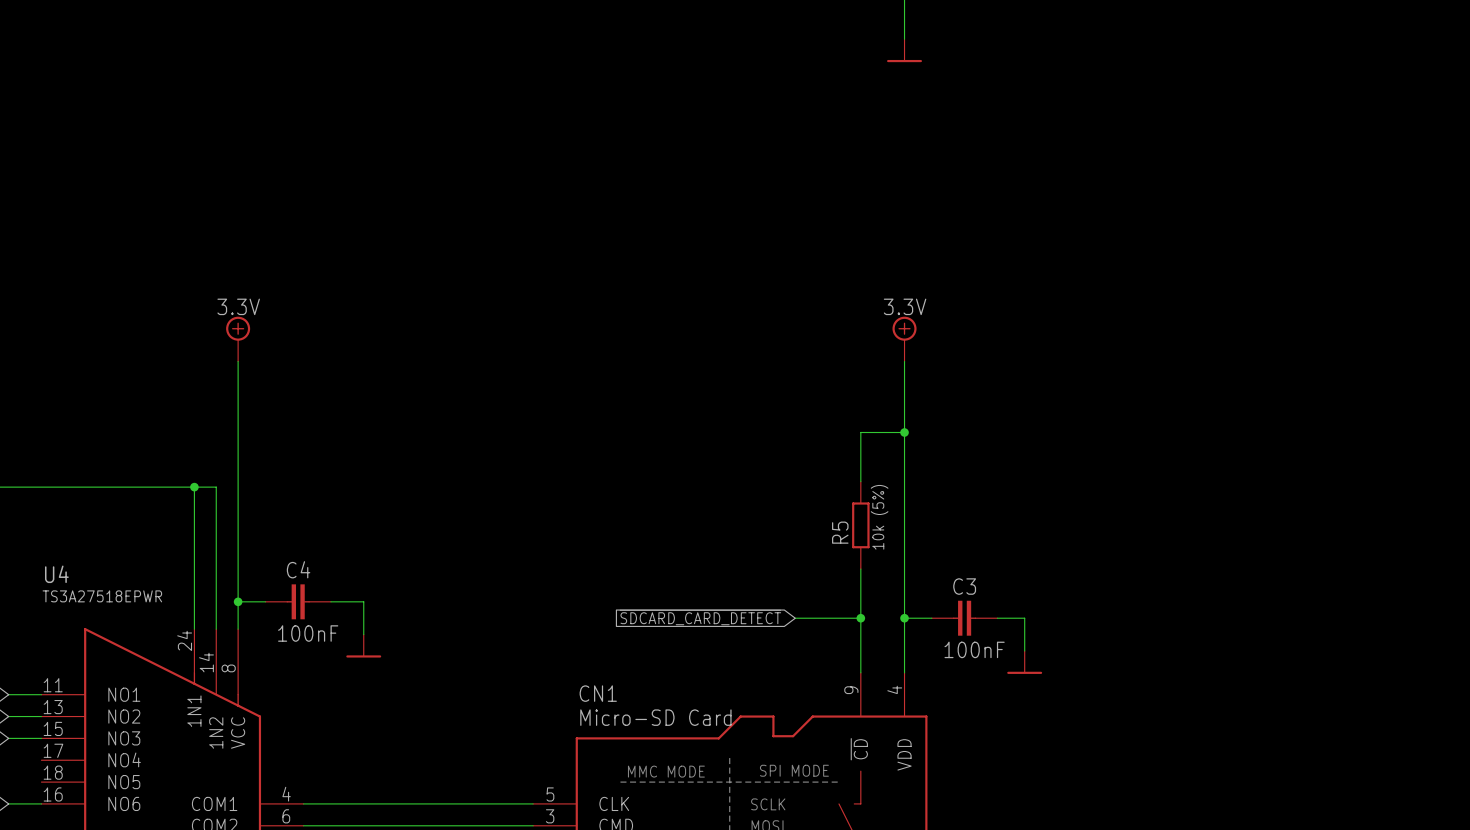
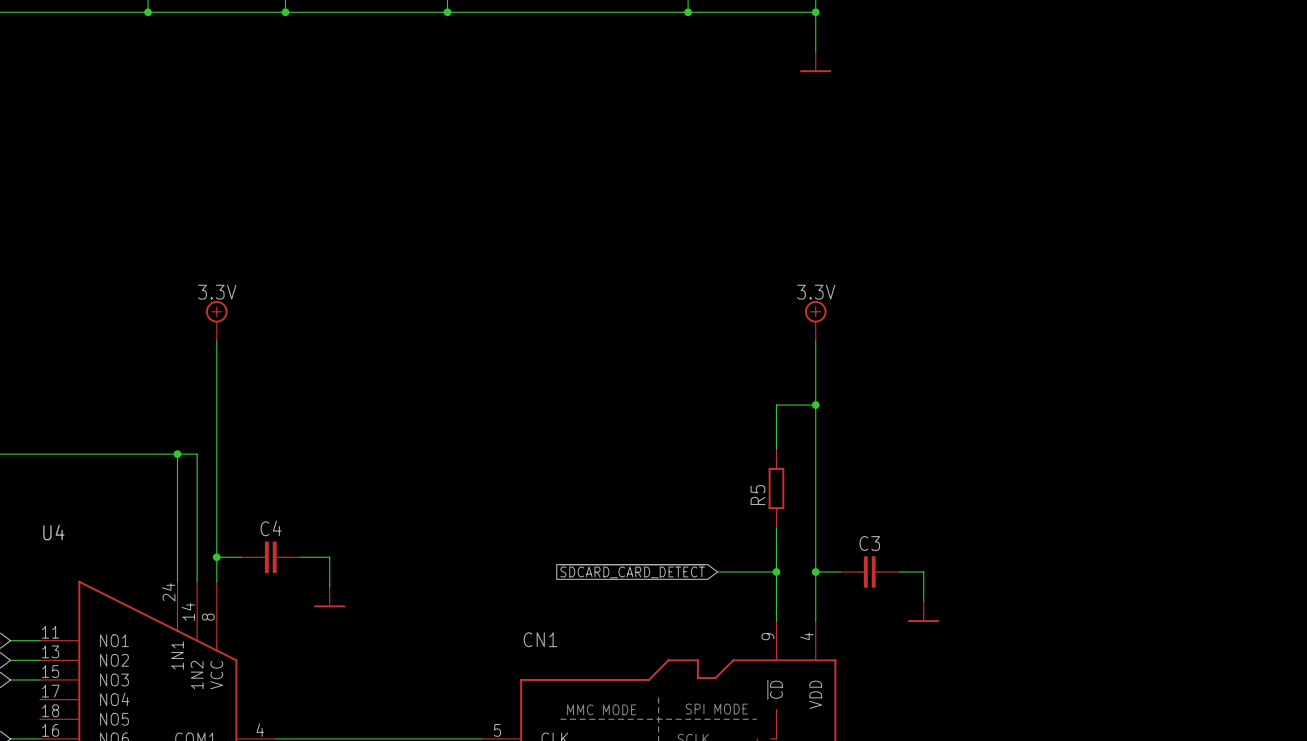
R5 value: 10k (5%) (879, 517) -> none
U4 value: TS3A27518EPWR (102, 596) -> none
C4 value: 100nF (308, 633) -> none
C3 value: 100nF (974, 649) -> none
CN1 value: Micro-SD Card (655, 717) -> none

